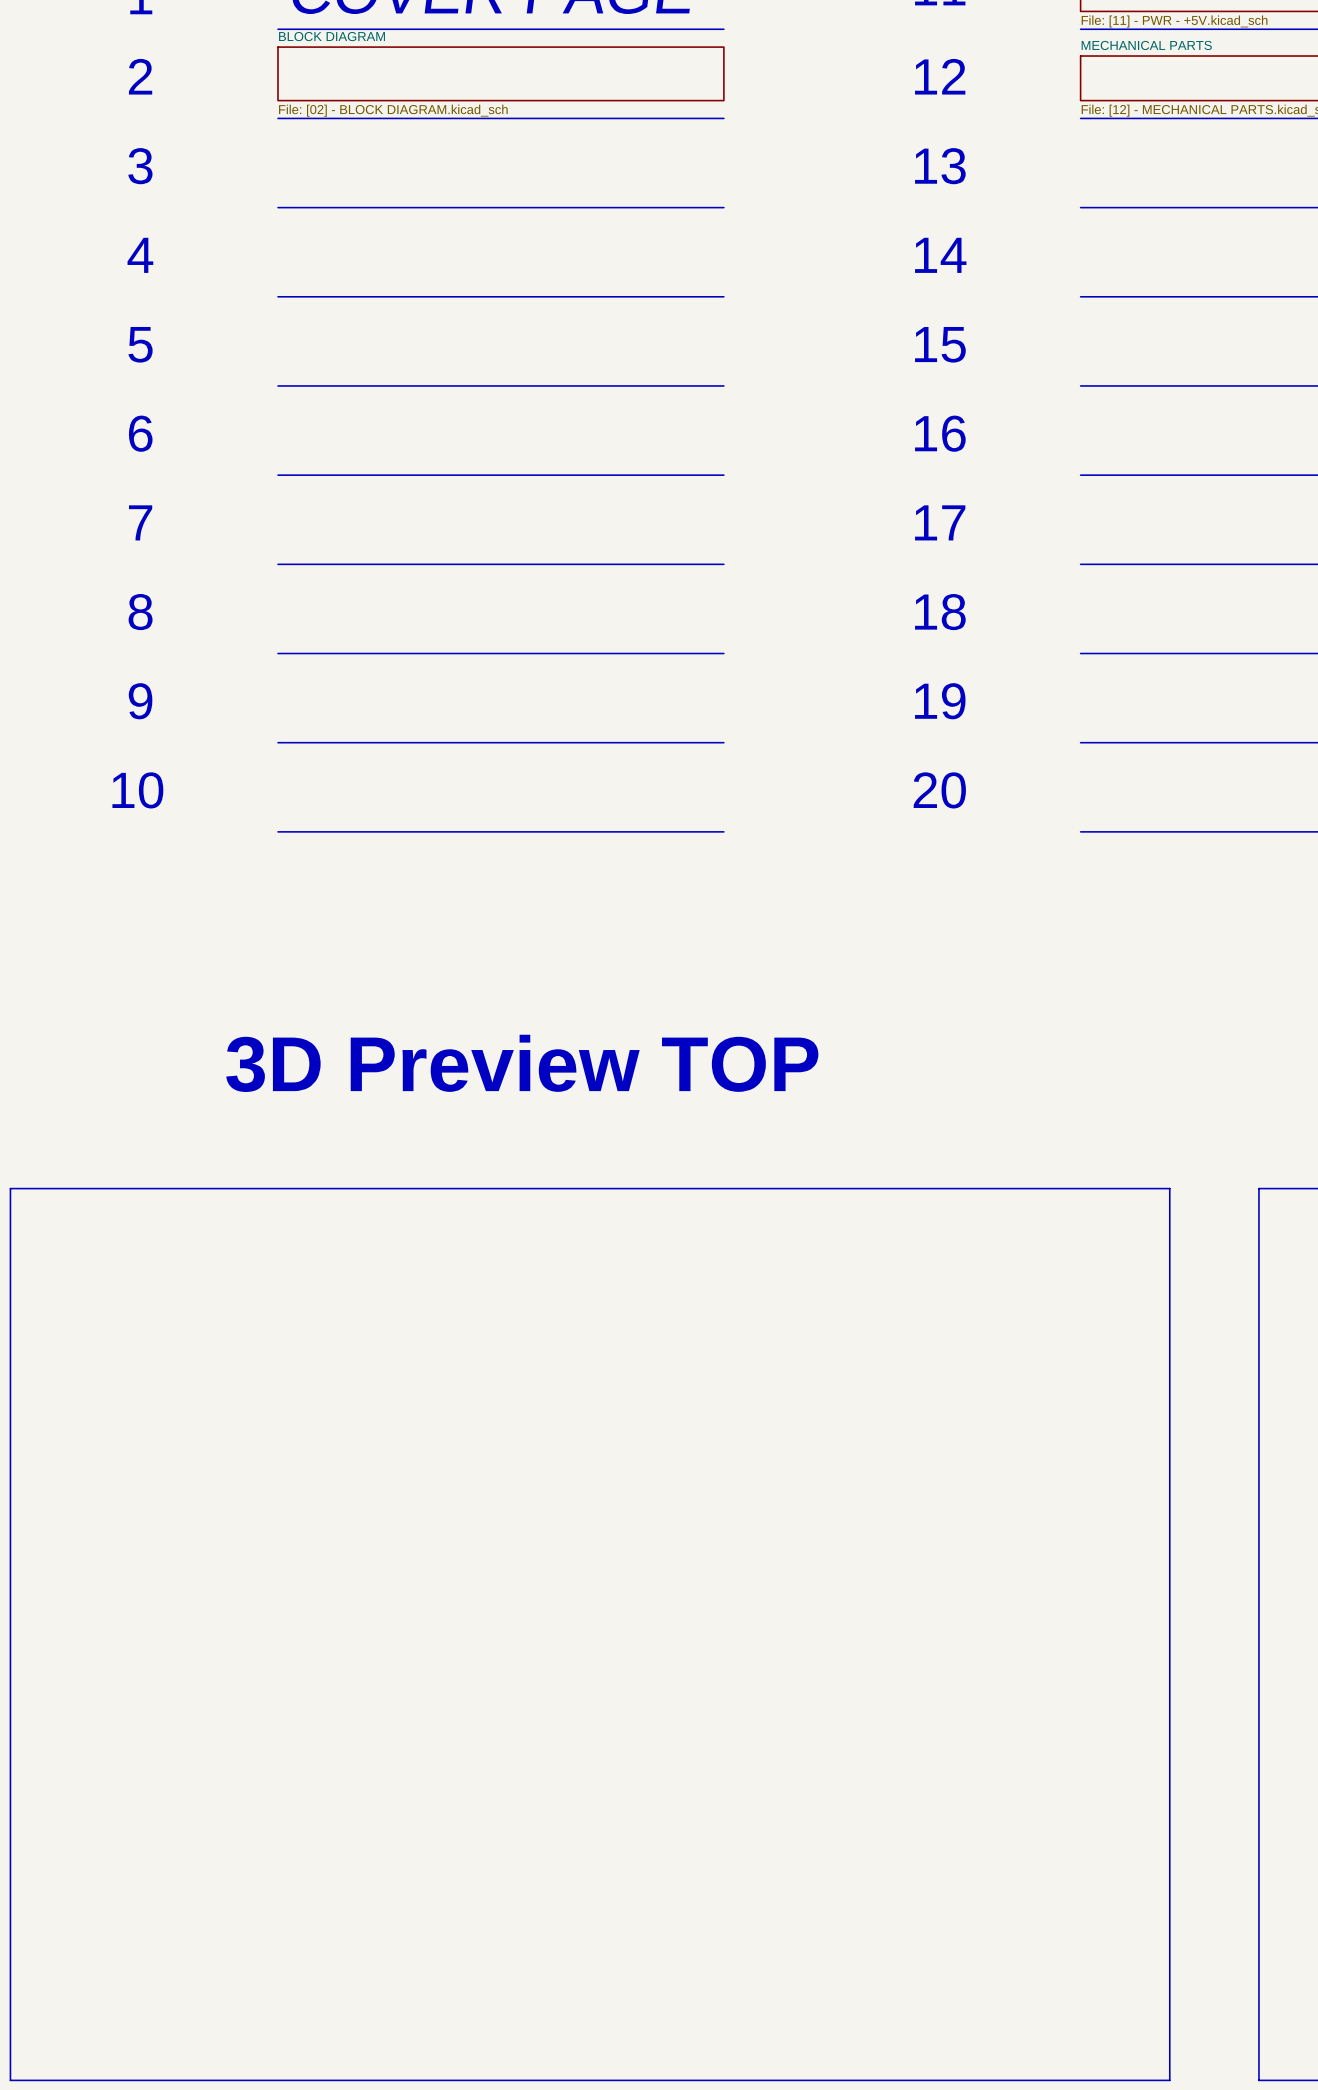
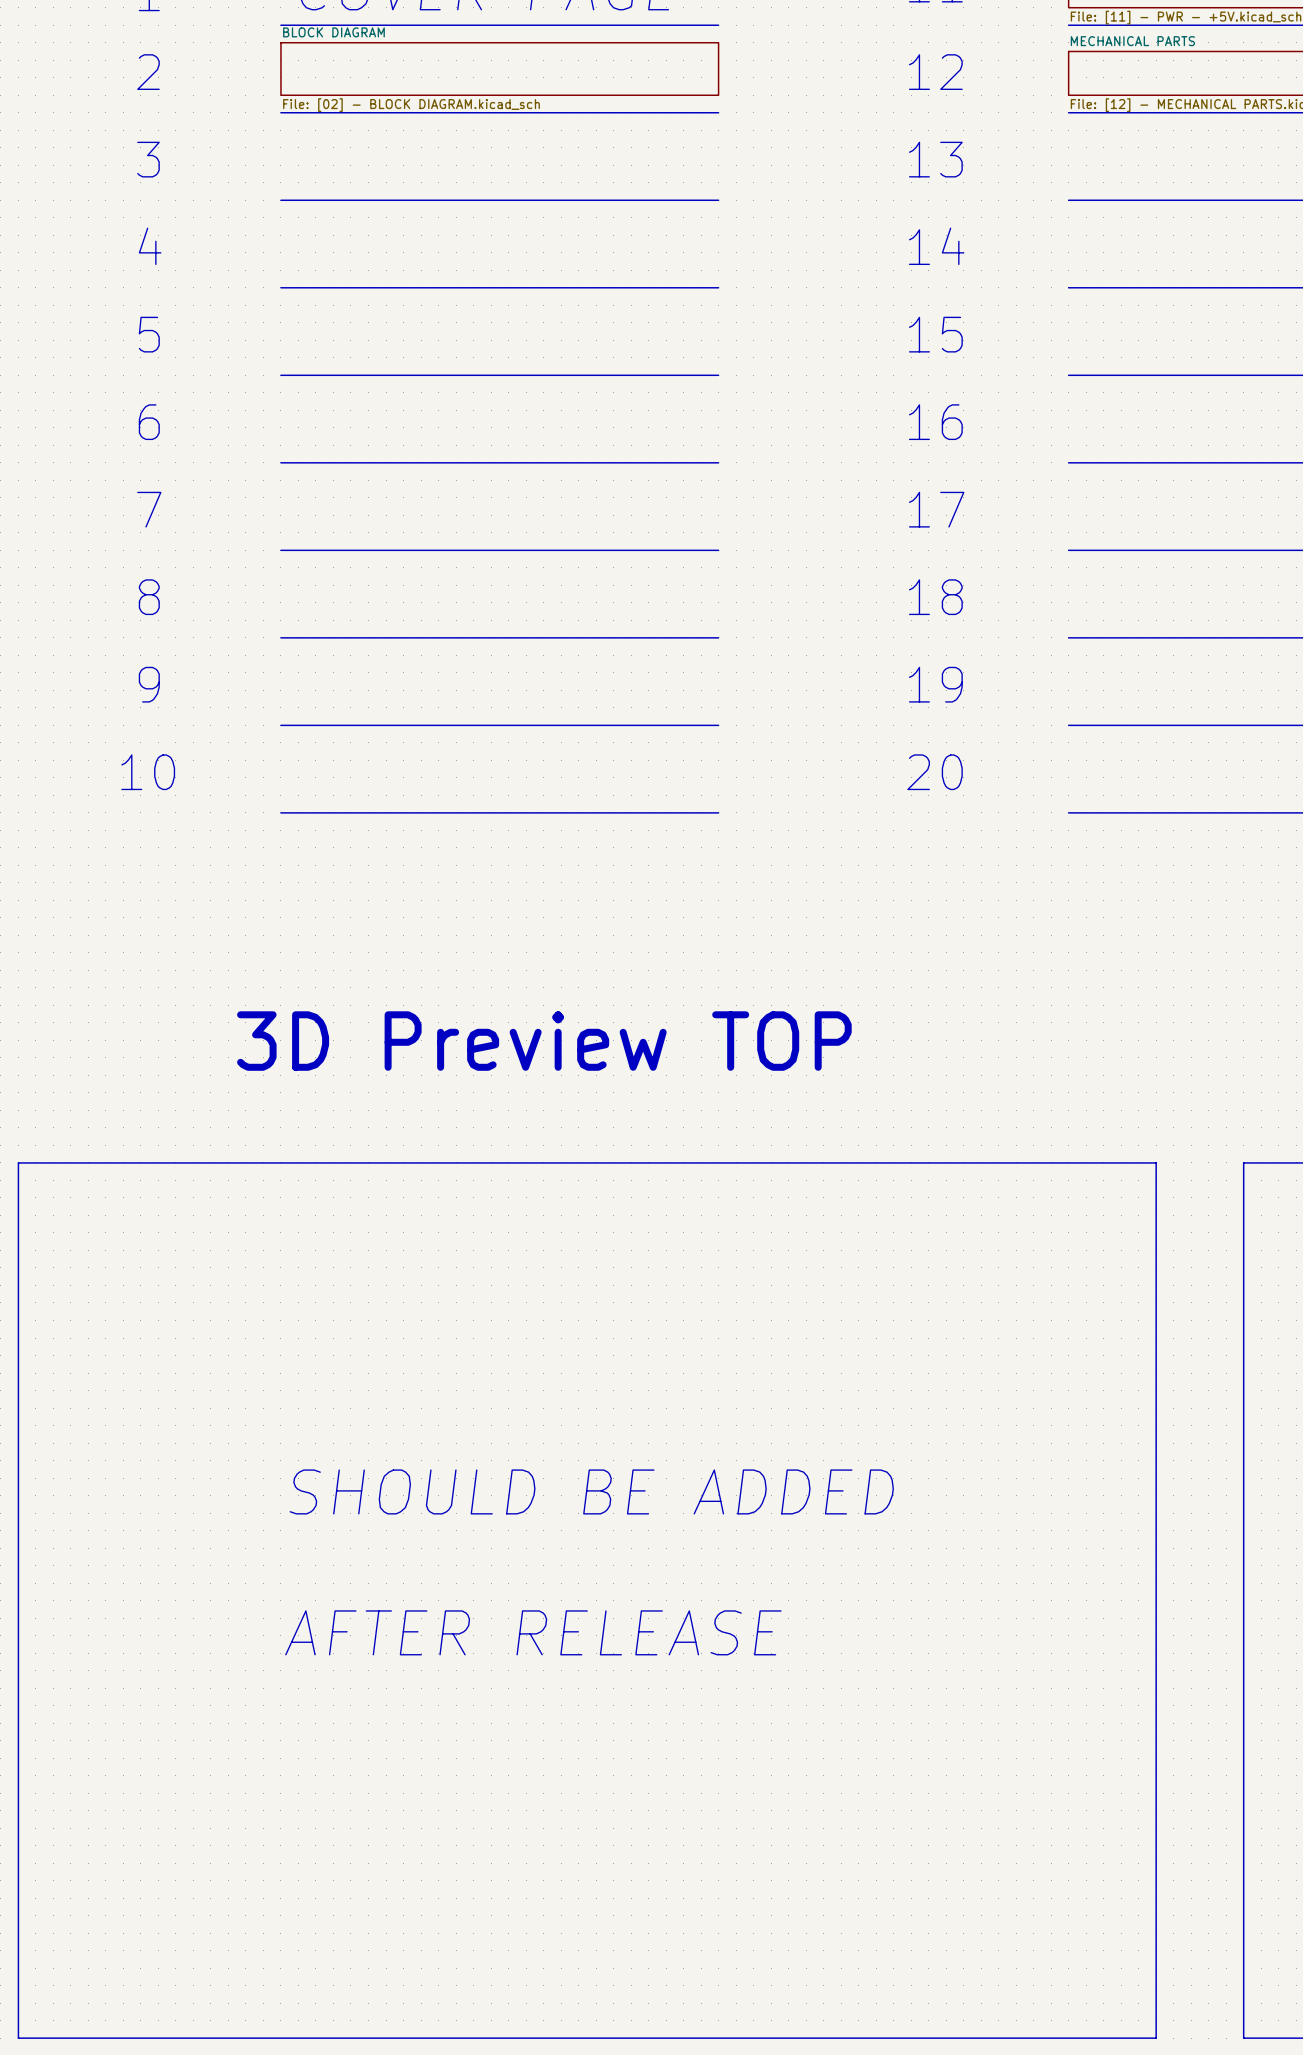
text: none -> SHOULD BE ADDED (591, 1491)
text: none -> AFTER RELEASE (533, 1632)

